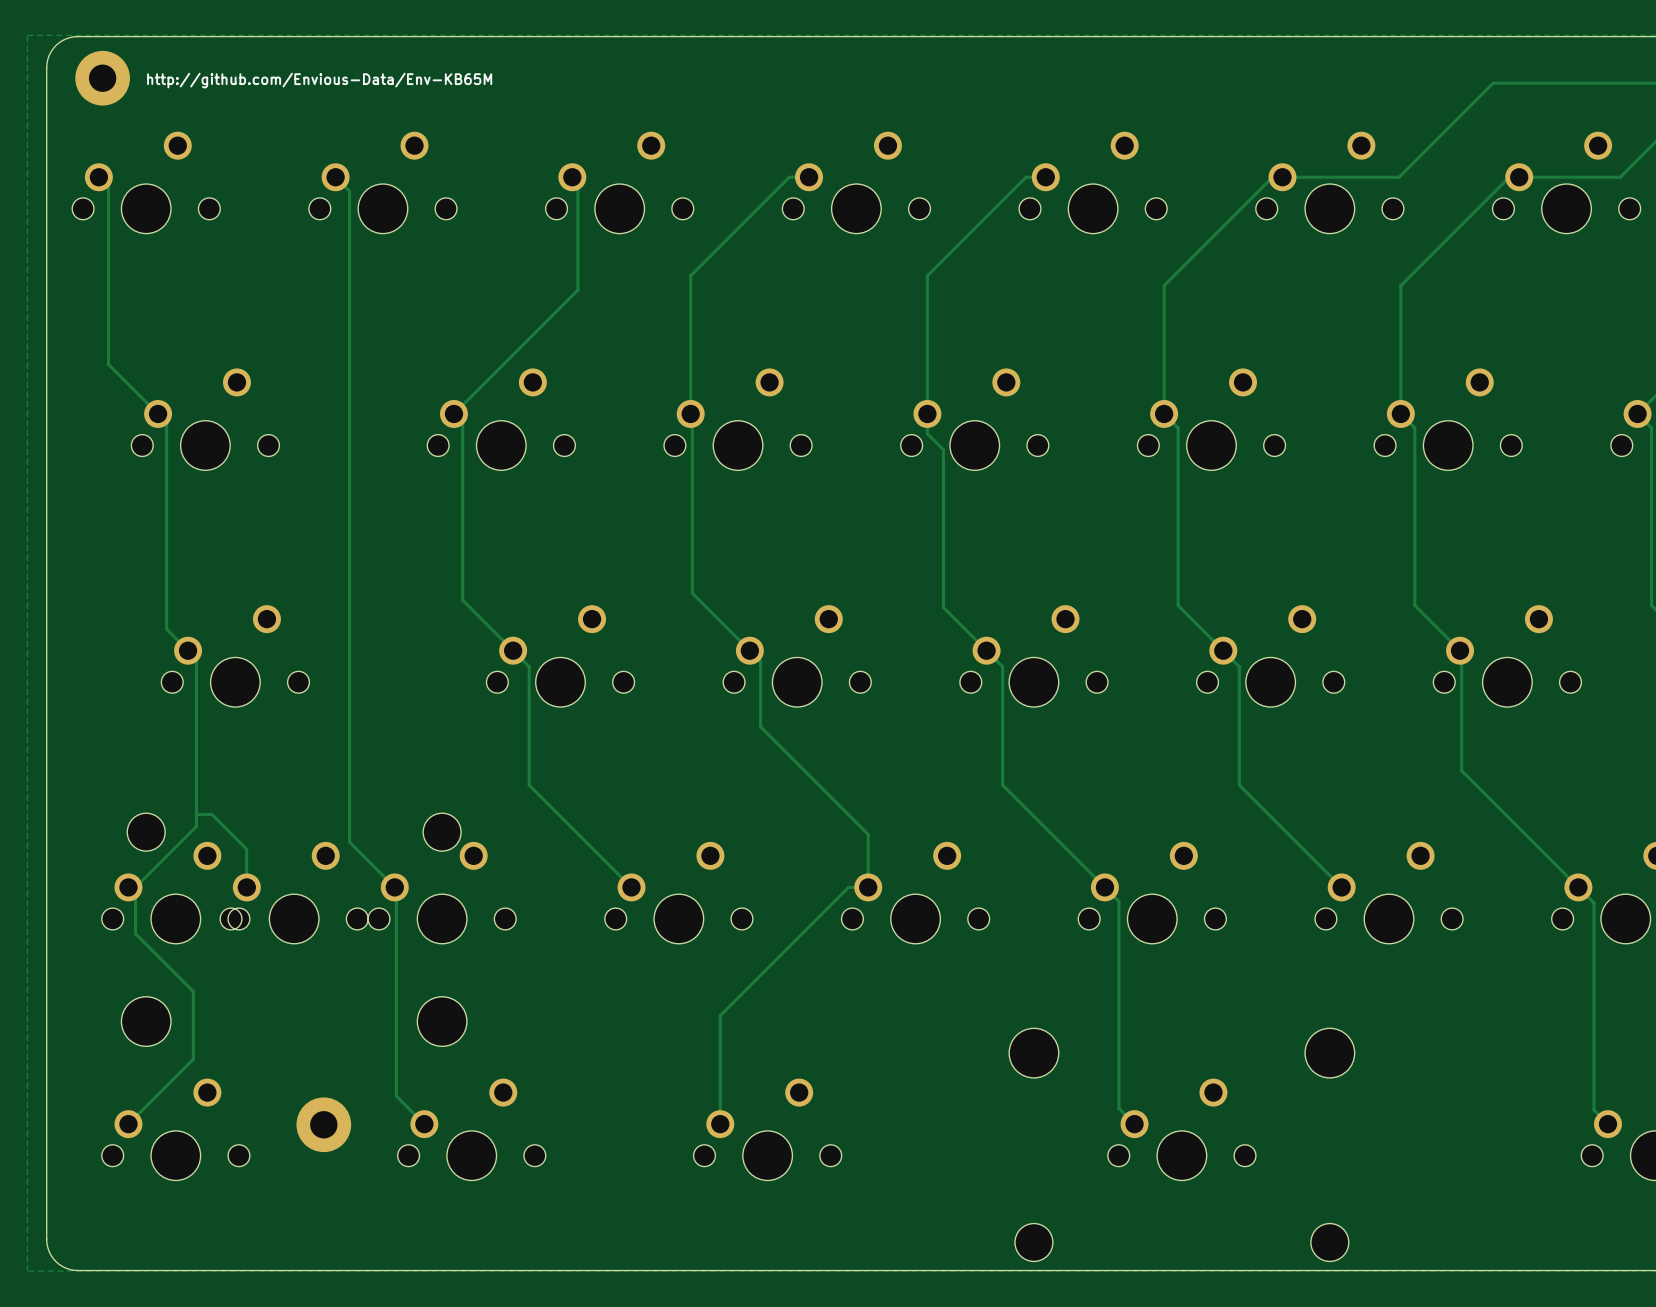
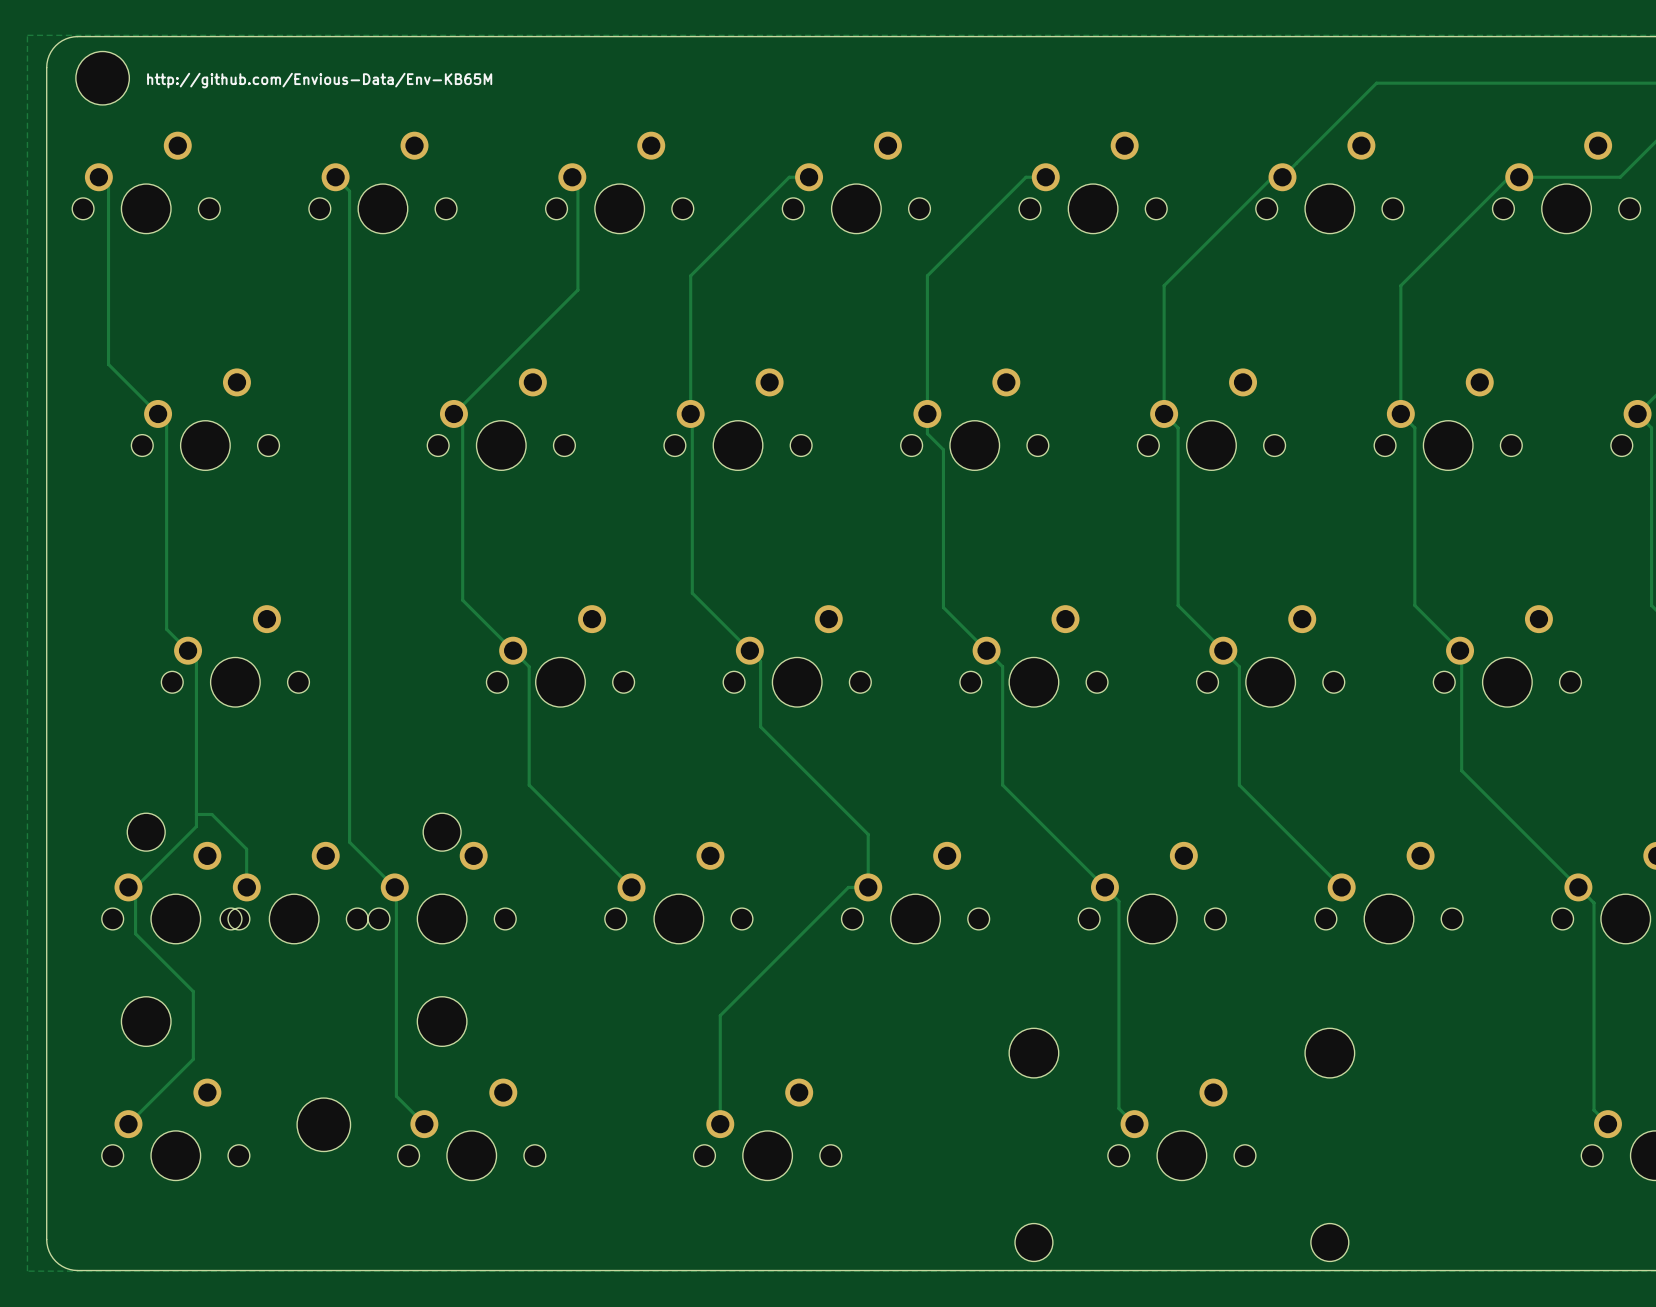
part footprint: [75, 50, 130, 106] -> [75, 51, 130, 105]
track: (1493, 83) (1399, 177) (1282, 177) -> (1493, 83) (1376, 83) (1282, 177)
part footprint: [296, 1097, 352, 1153] -> [297, 1098, 351, 1152]

